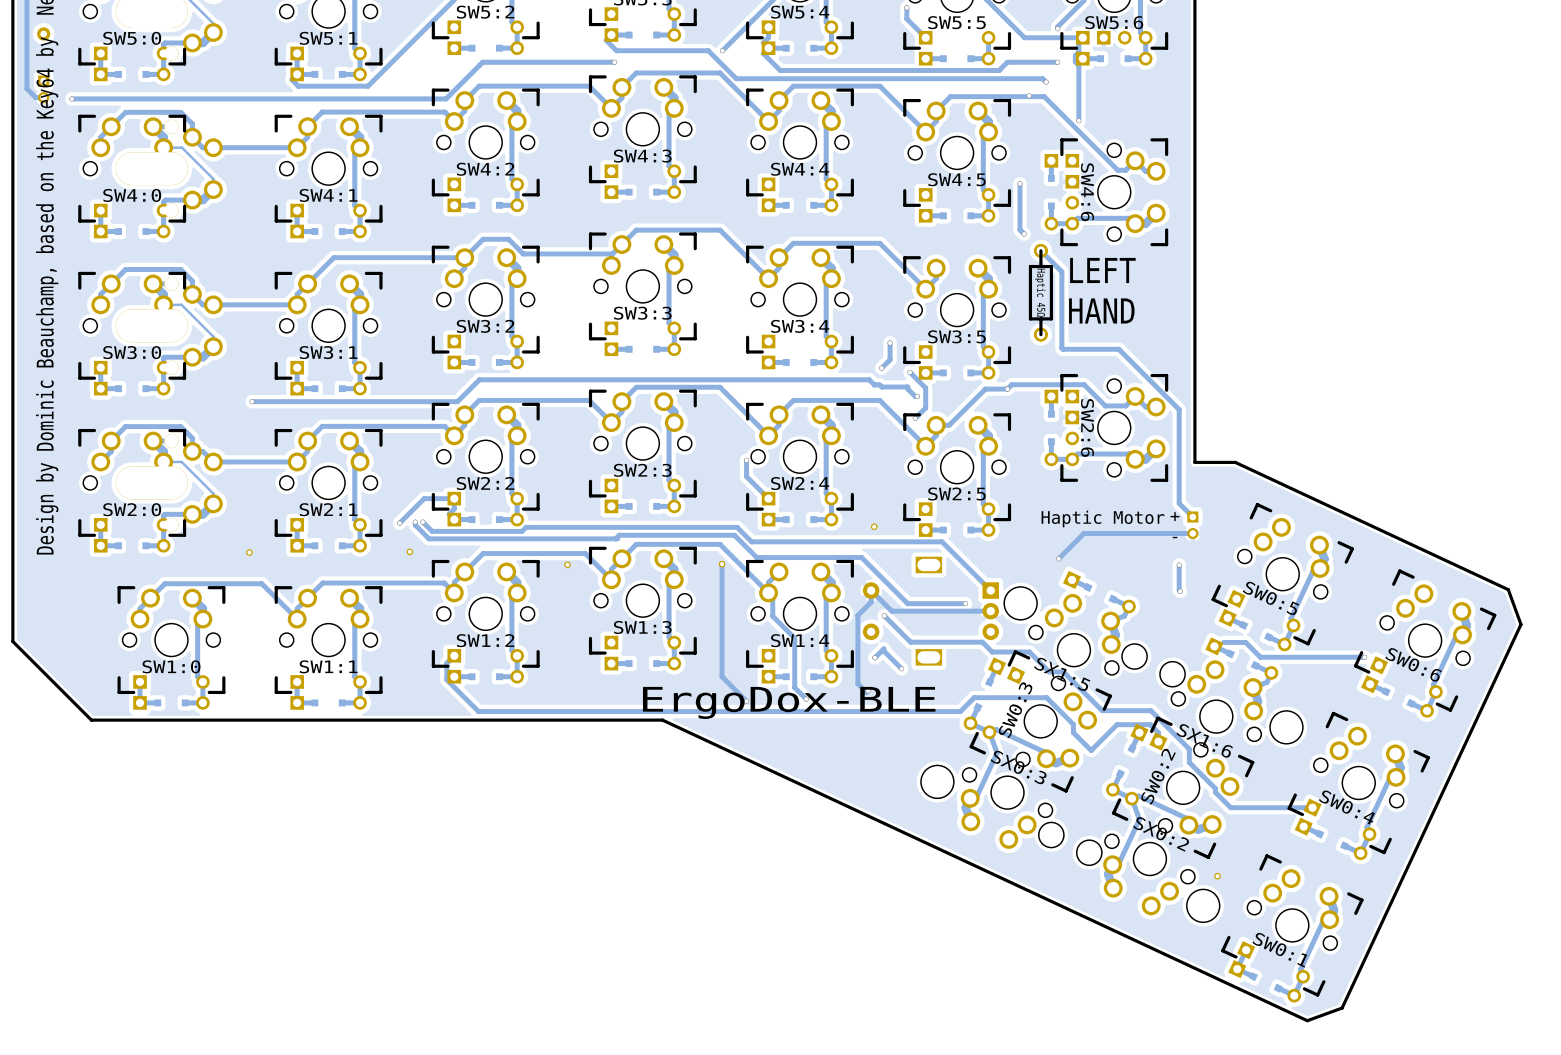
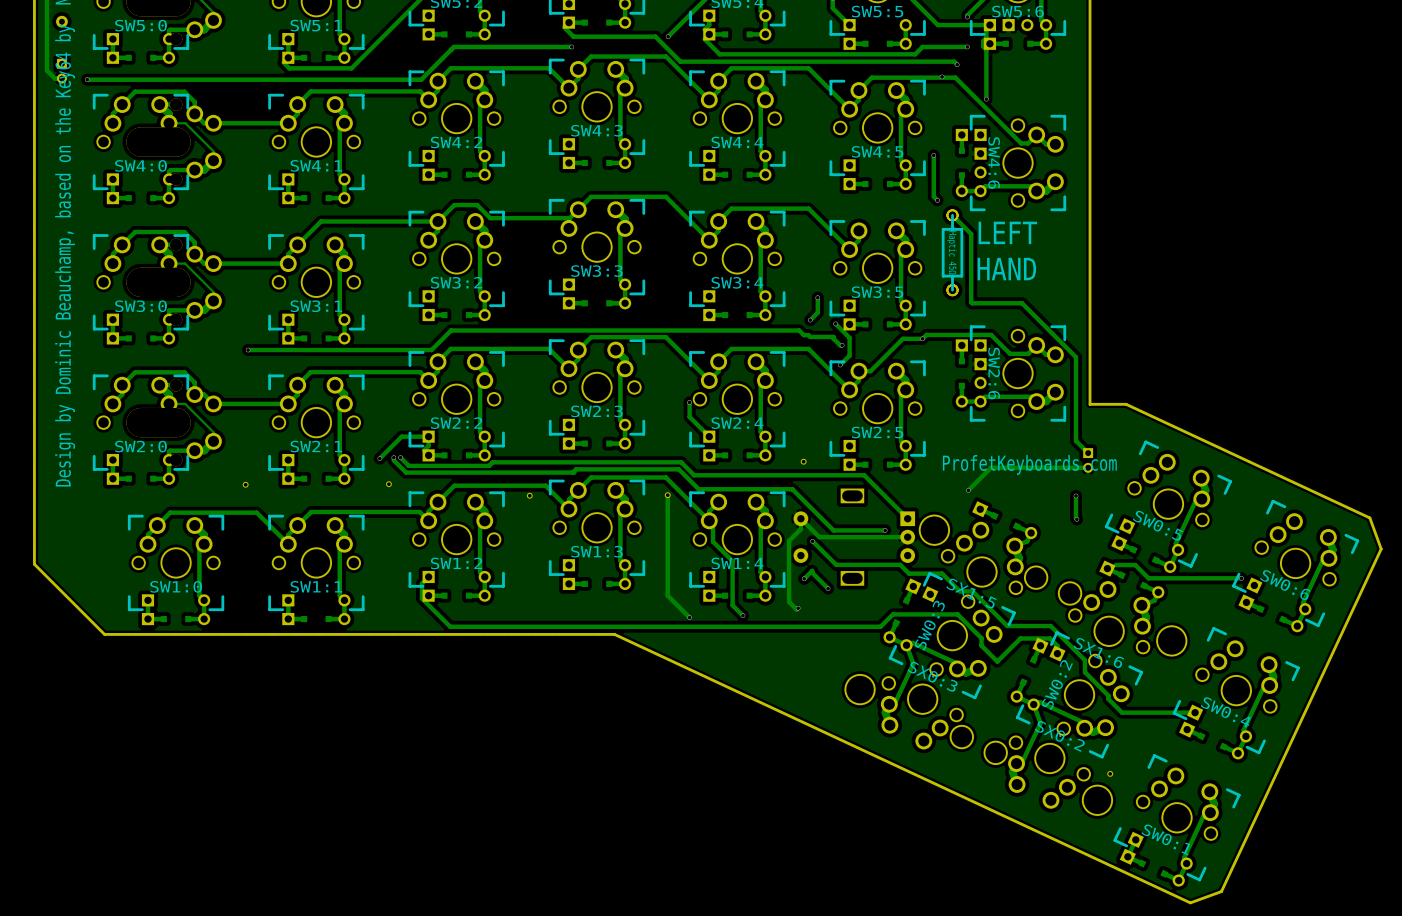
text: + (1175, 516) -> none
text: Haptic Motor (1102, 518) -> none
text: none -> ProfetKeyboards.com (1029, 464)
text: - (1175, 537) -> none
text: ErgoDox-BLE (789, 702) -> none

